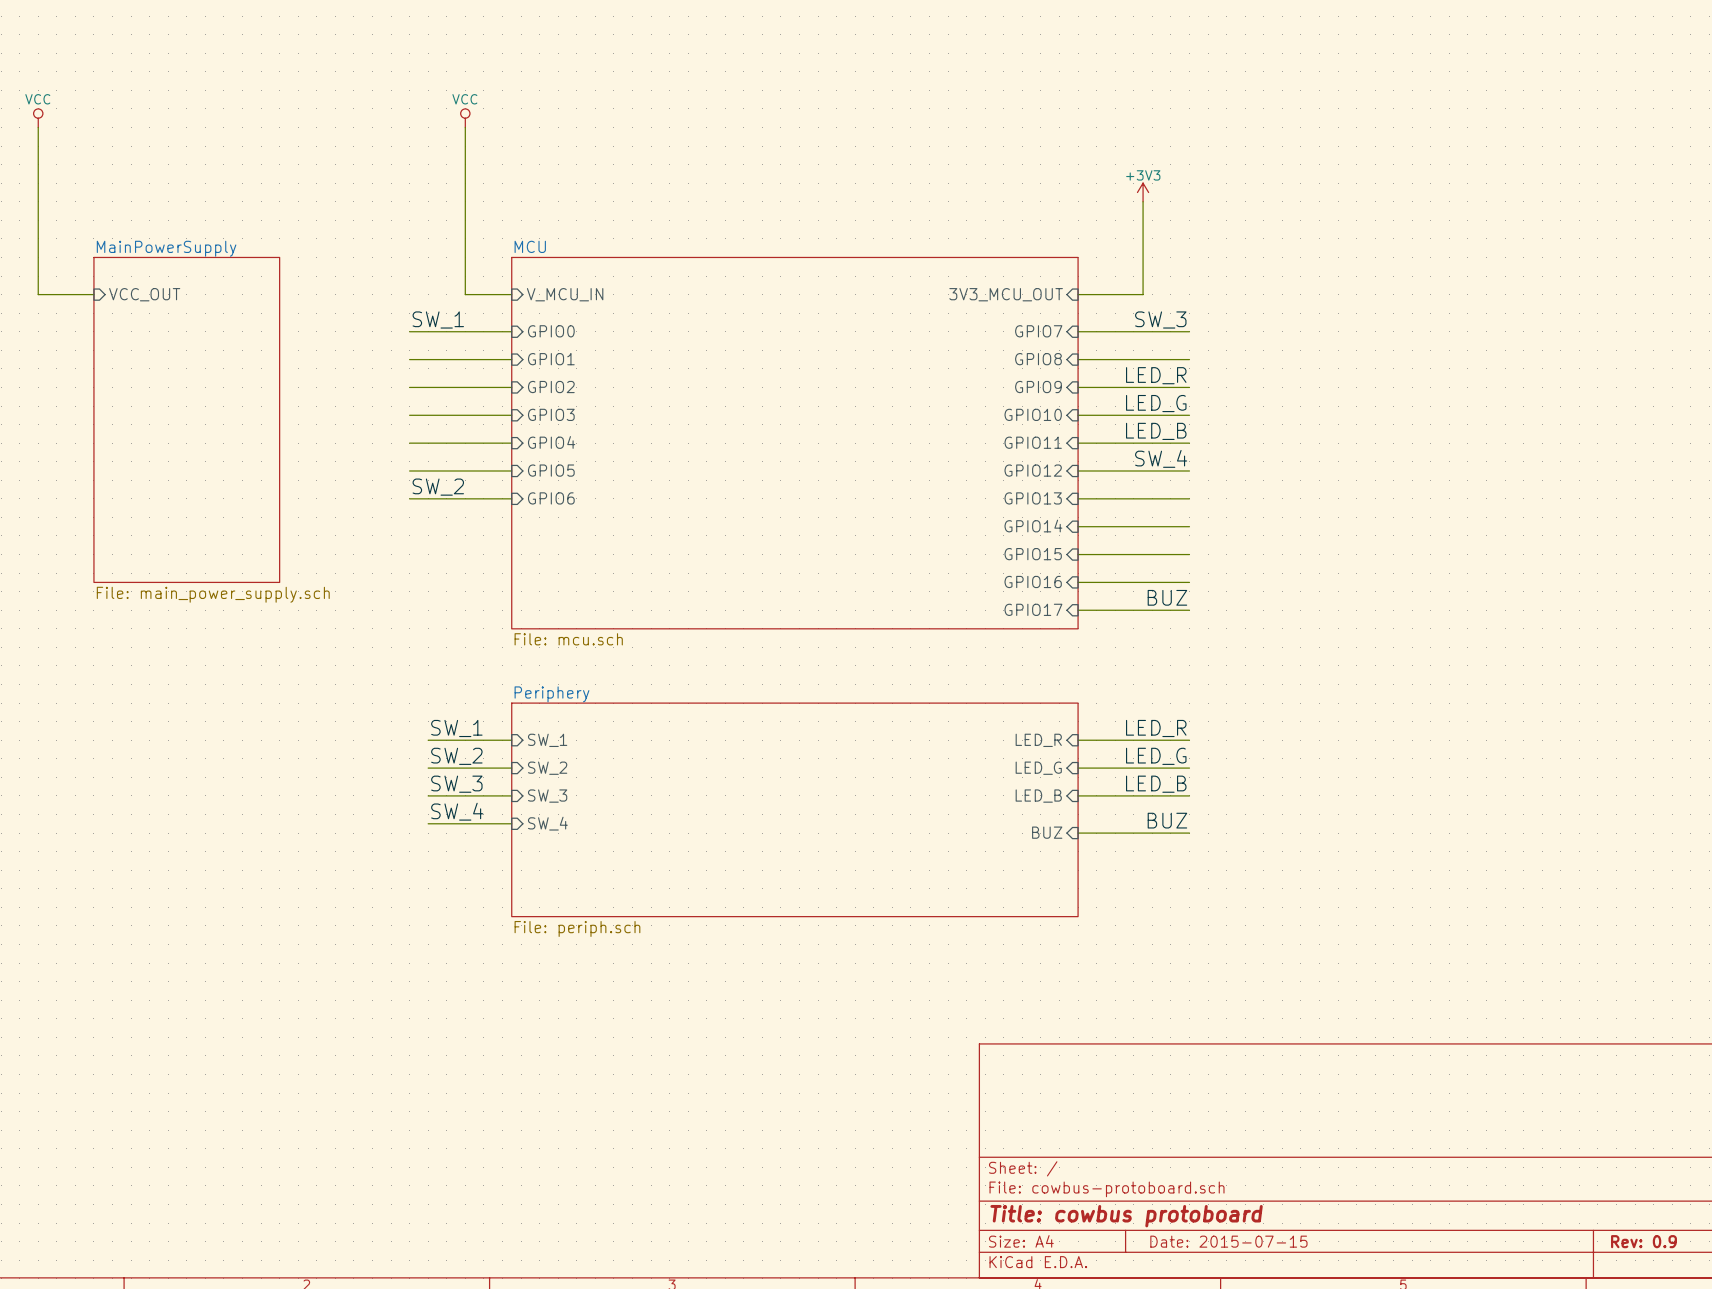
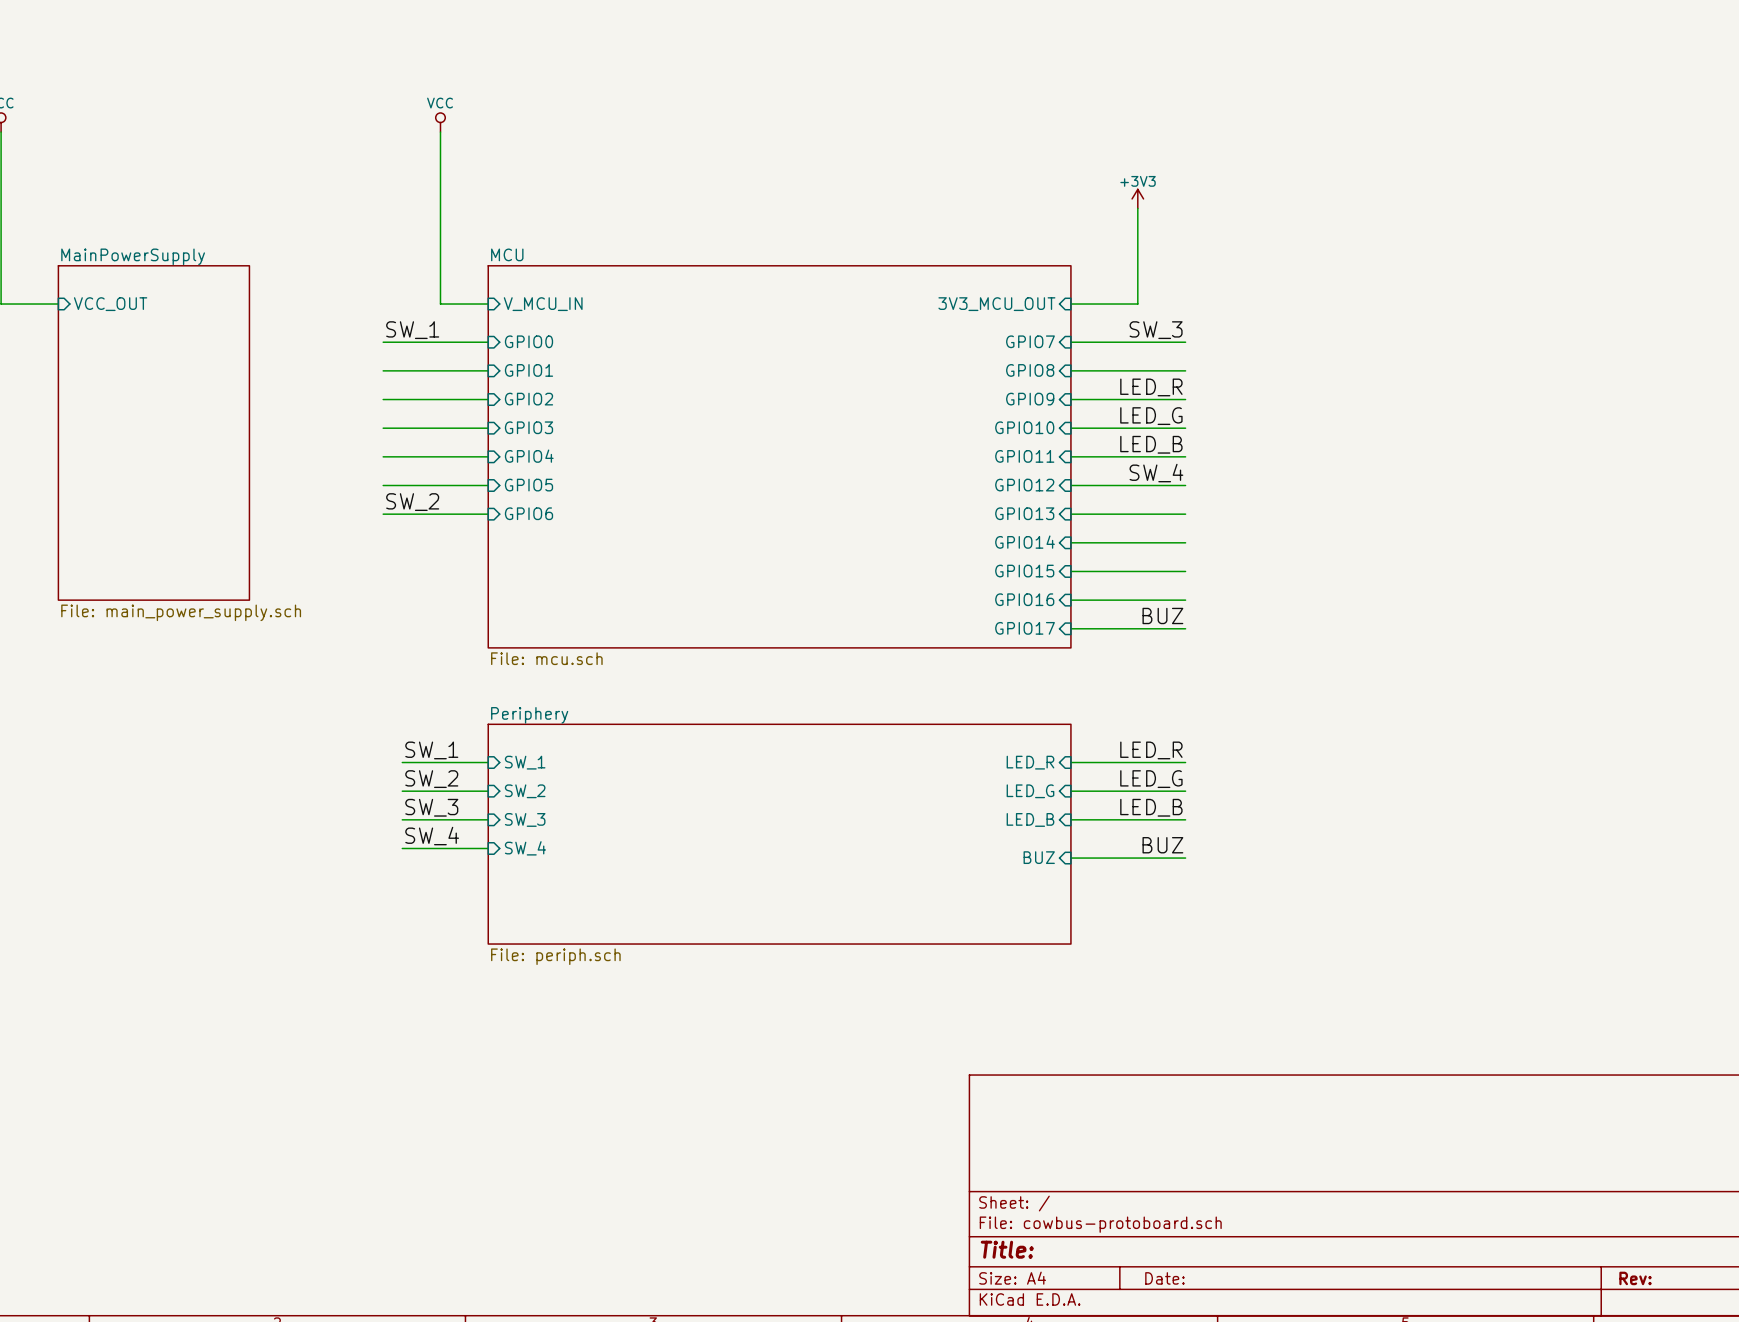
title block: Title: cowbus protoboard (1126, 1216) -> Title: (1007, 1249)
title block: Date: 2015-07-15 (1228, 1241) -> Date: (1164, 1278)
title block: Rev: 0.9 (1643, 1241) -> Rev: (1635, 1278)

